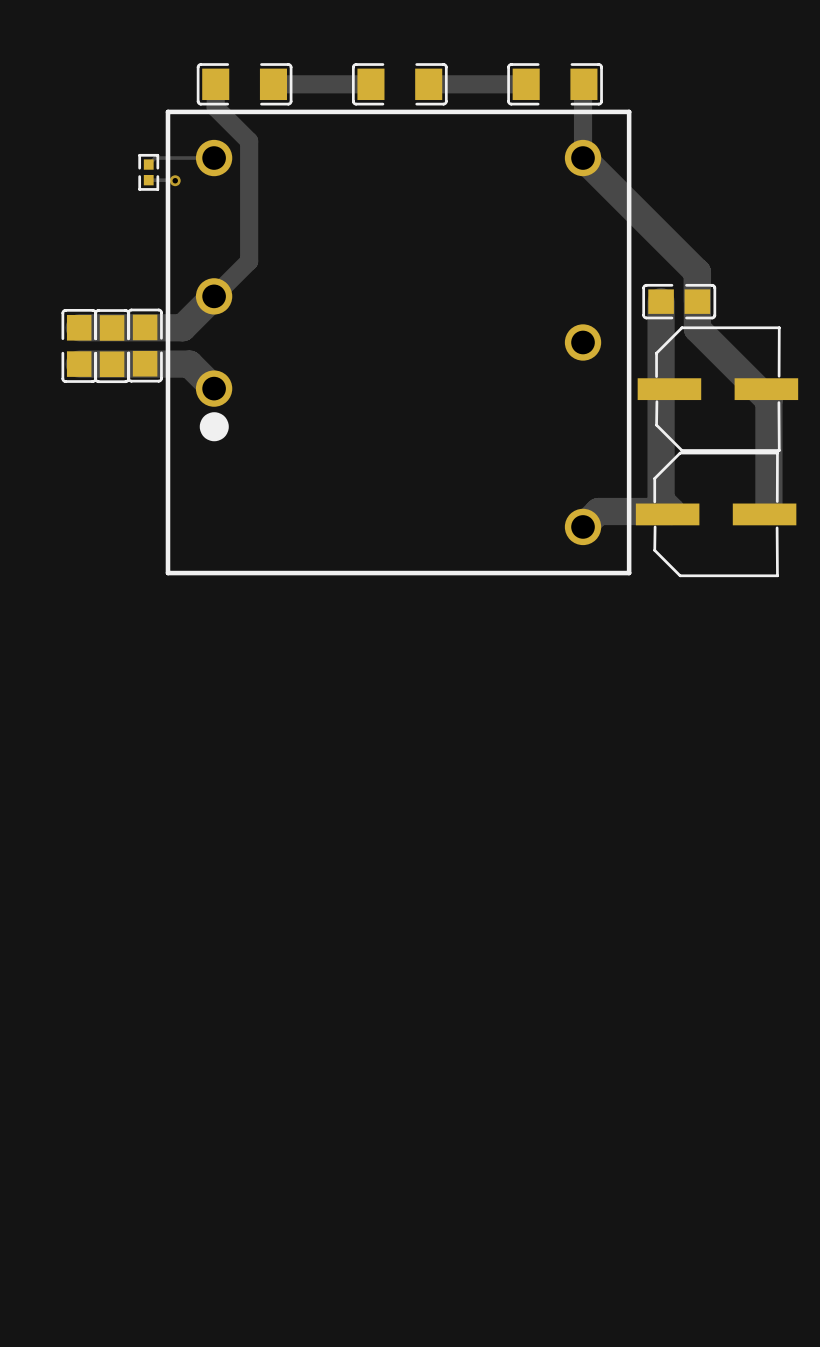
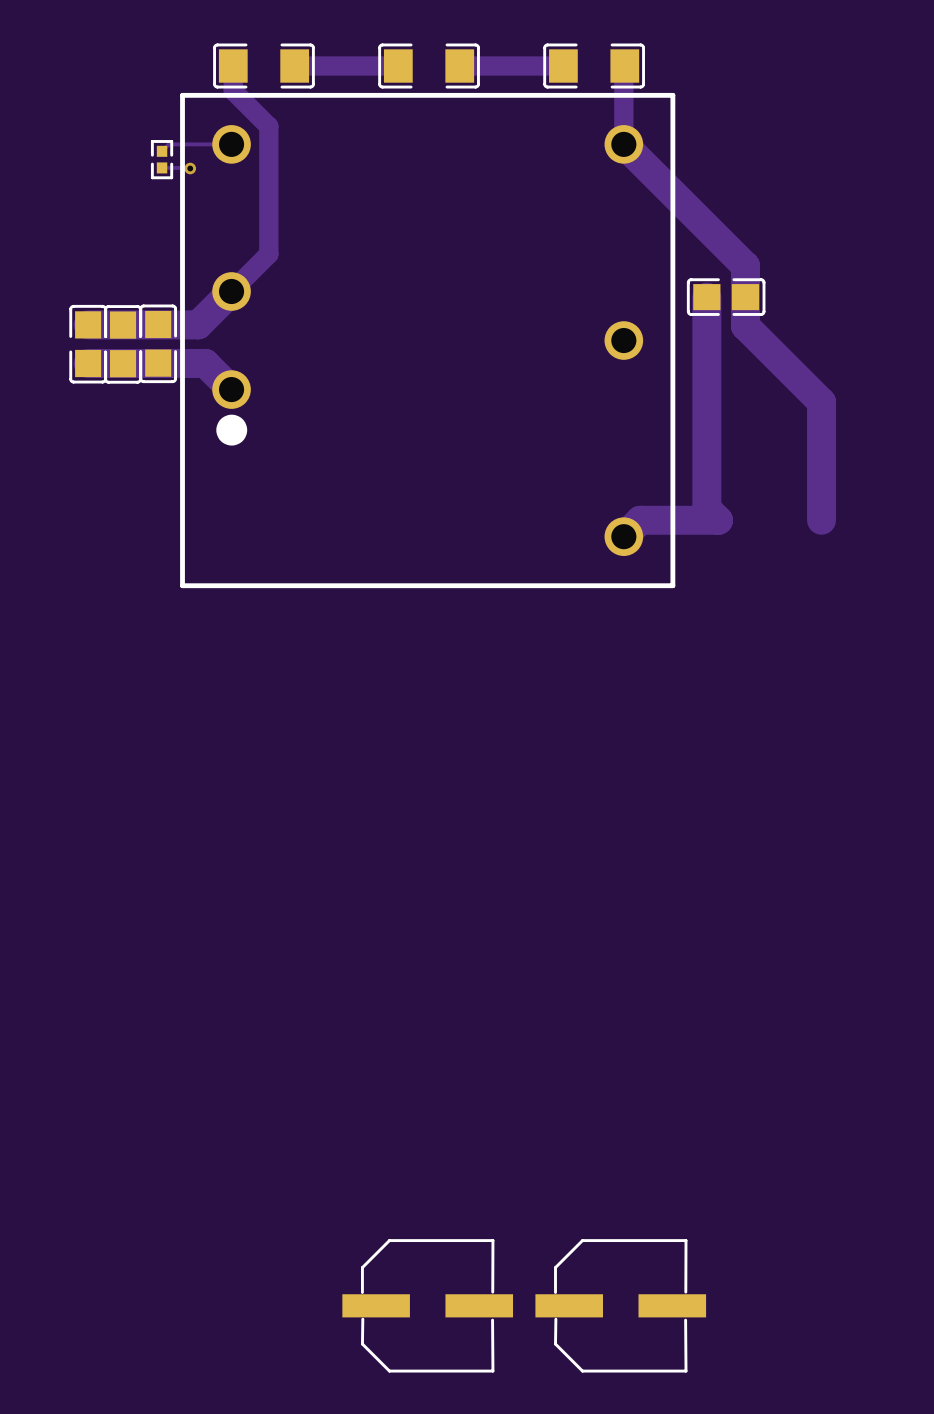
part: (717, 389) -> none
part: (716, 514) -> none
part: none -> (427, 1305)
part: none -> (620, 1305)

